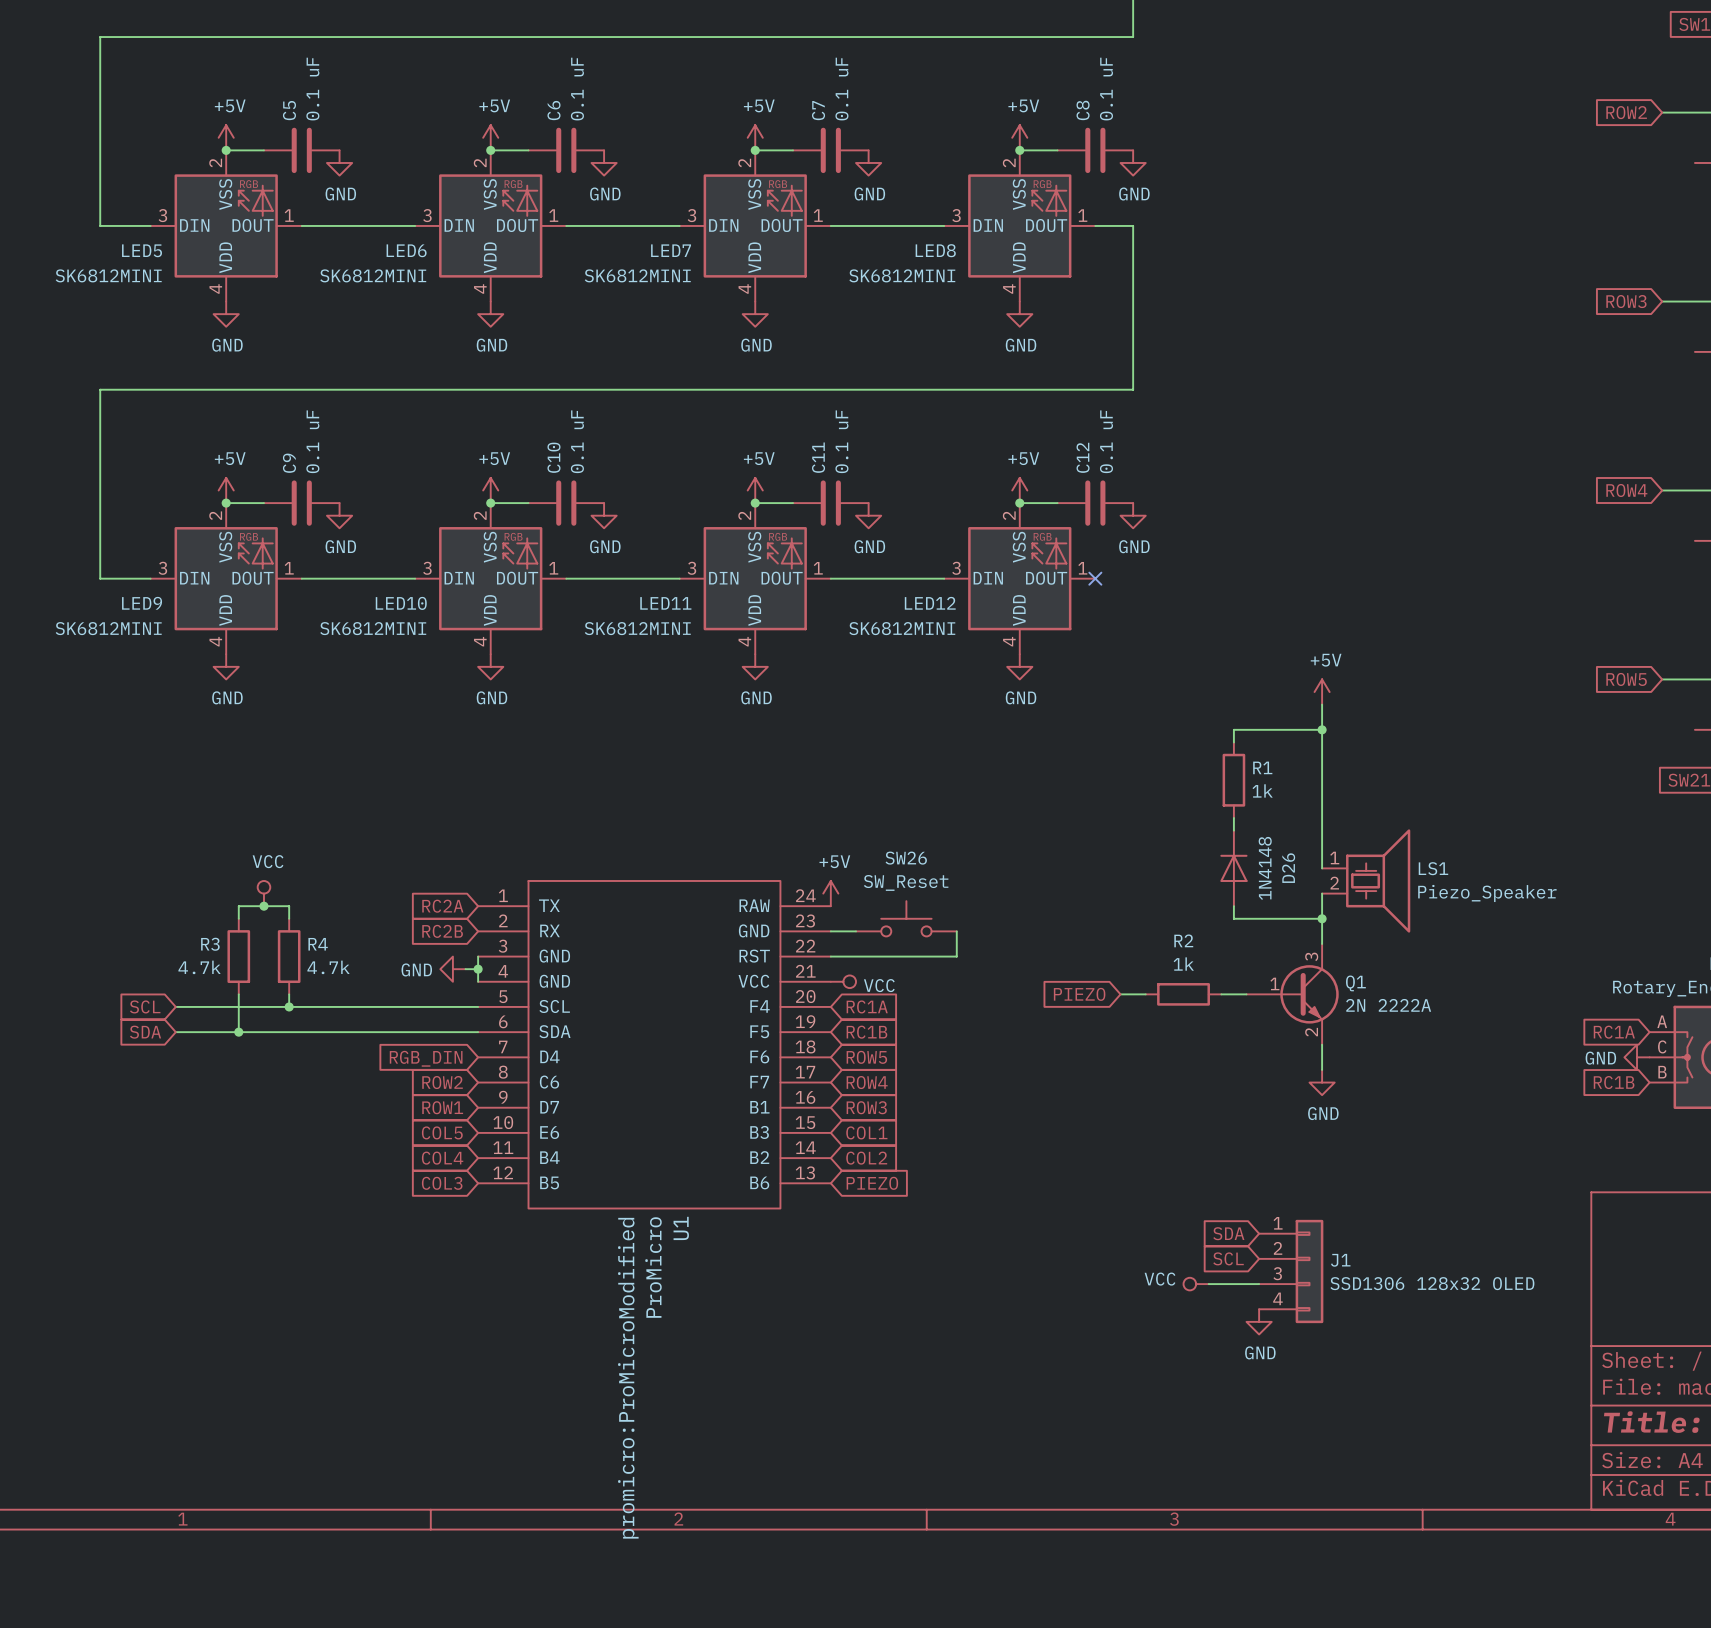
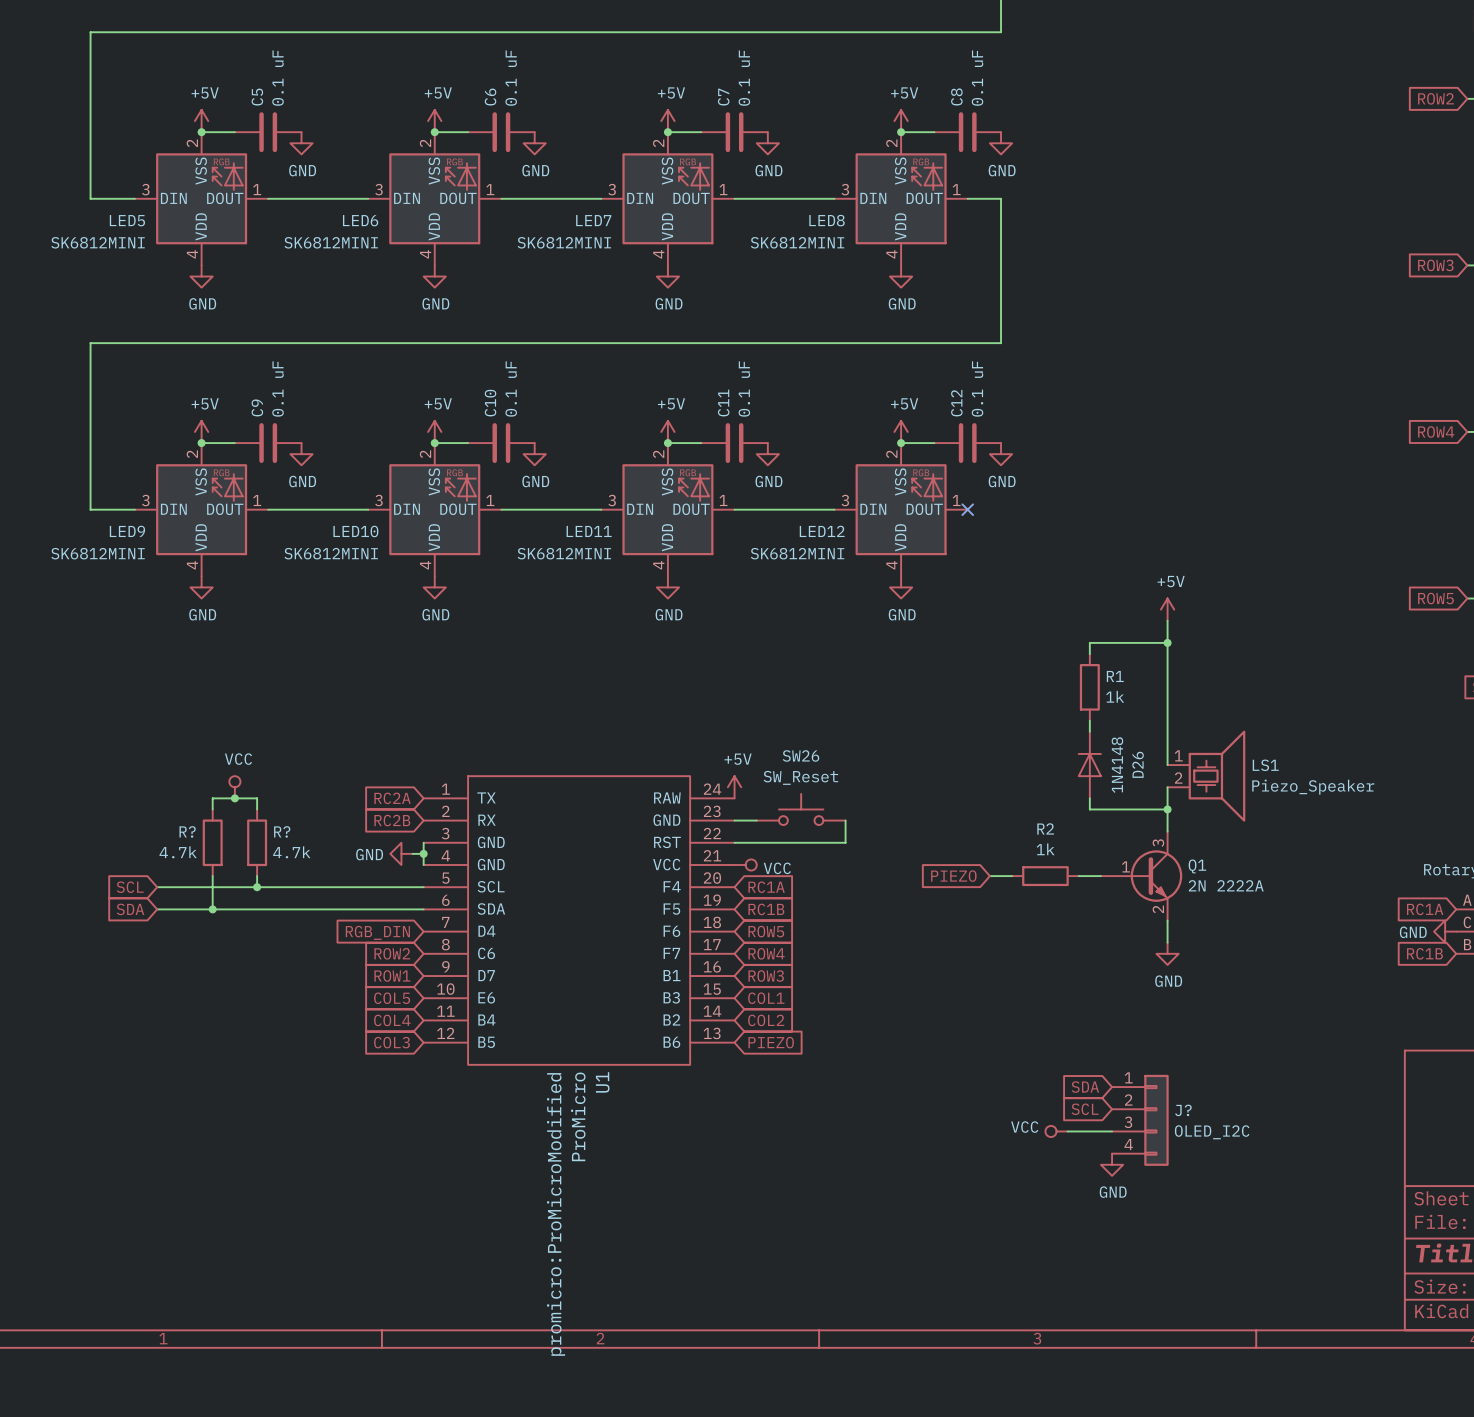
R3 name: R3 (210, 944) -> R? (187, 831)
R4 name: R4 (318, 944) -> R? (282, 831)
J1 name: J1 (1340, 1260) -> J? (1183, 1110)
J1 value: SSD1306 128x32 OLED (1432, 1283) -> OLED_I2C (1212, 1132)

